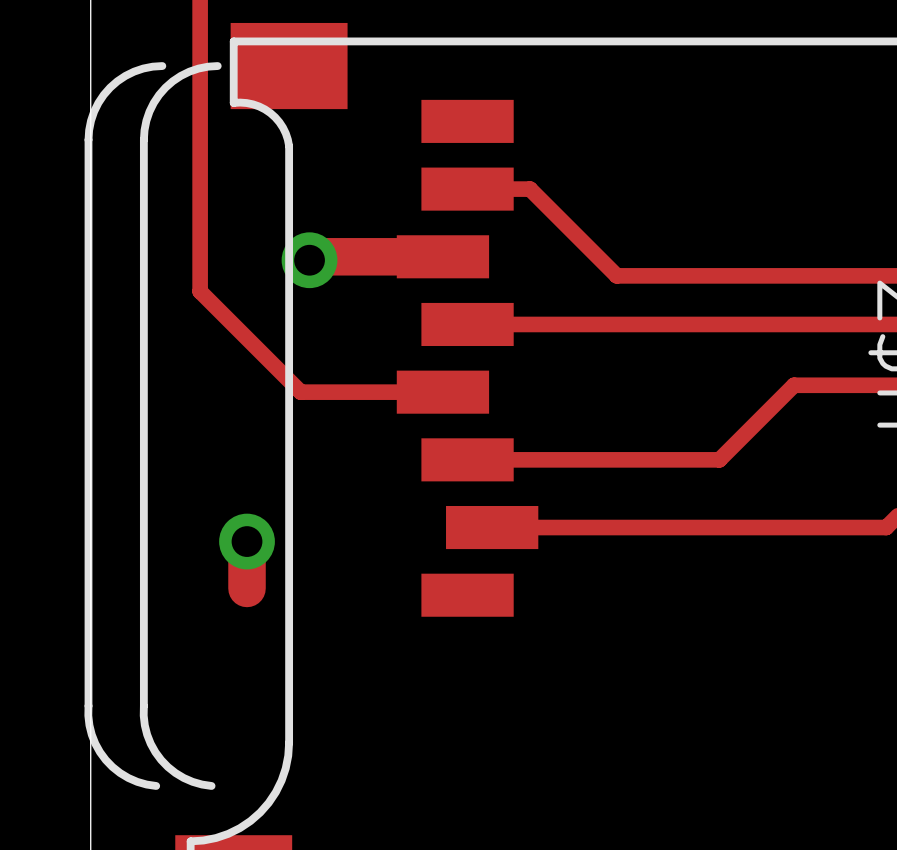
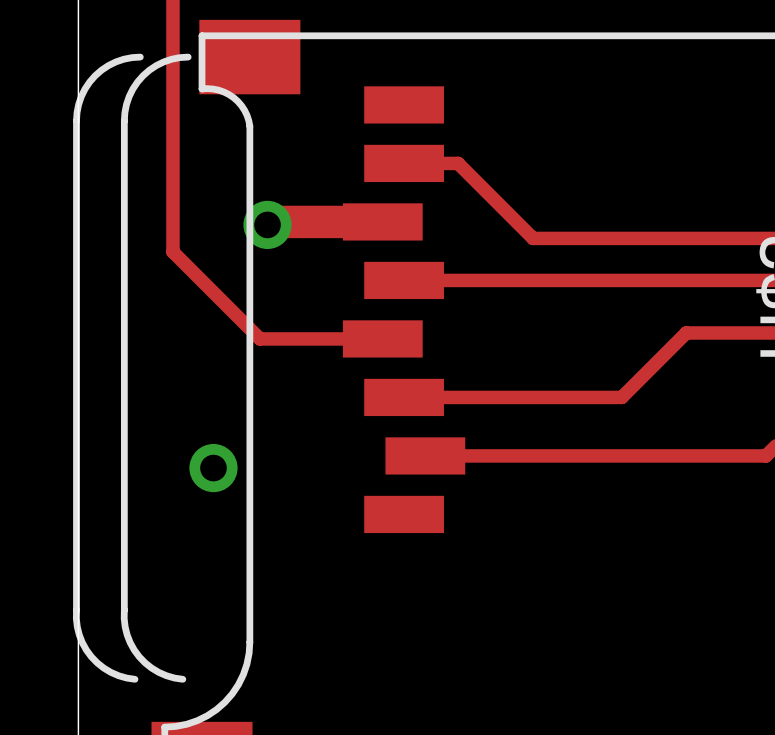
track: (247, 541) (247, 588) -> none

